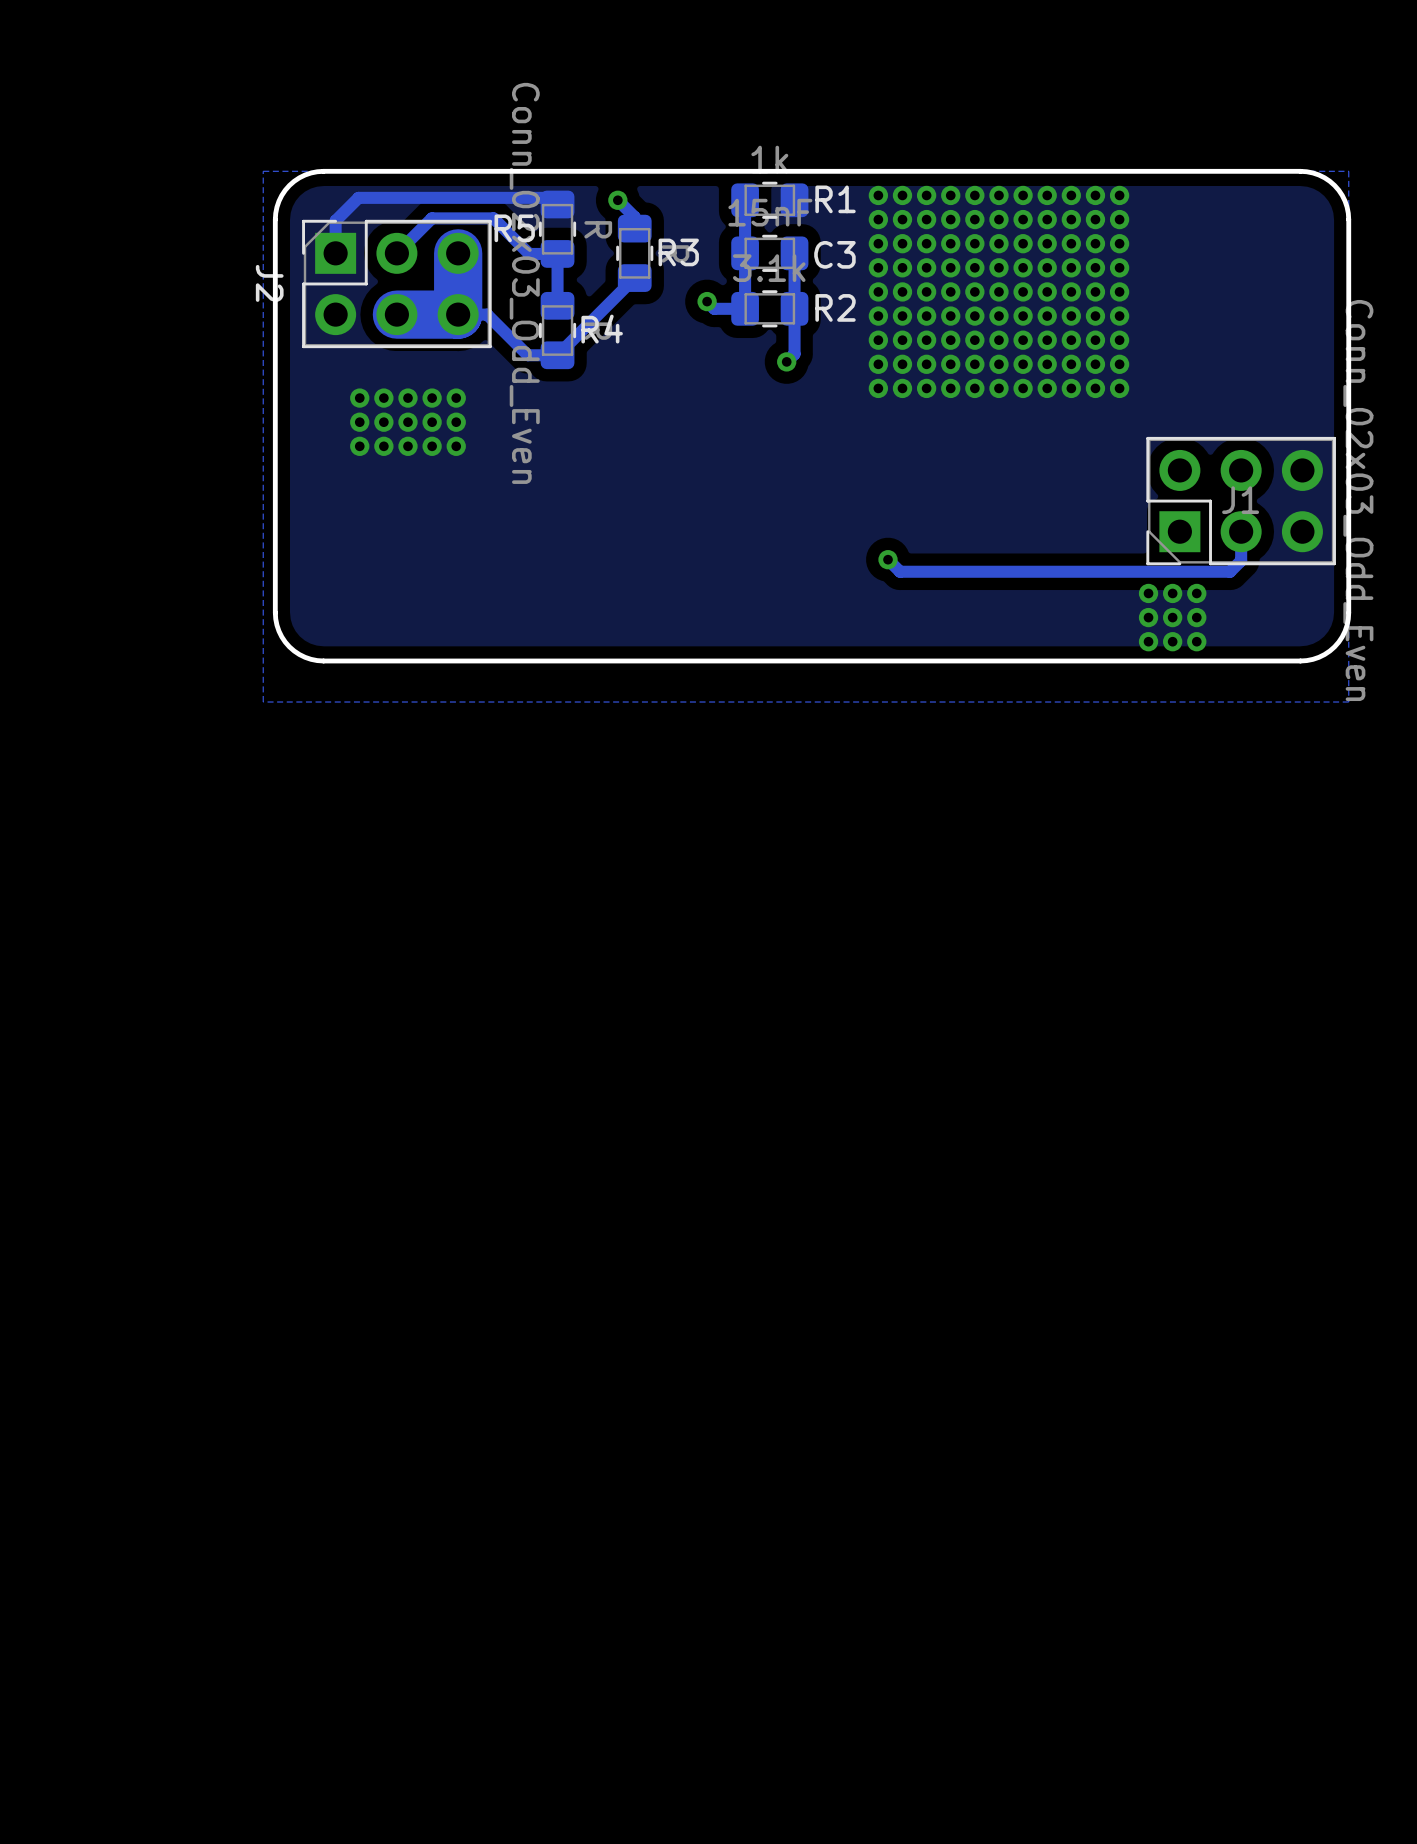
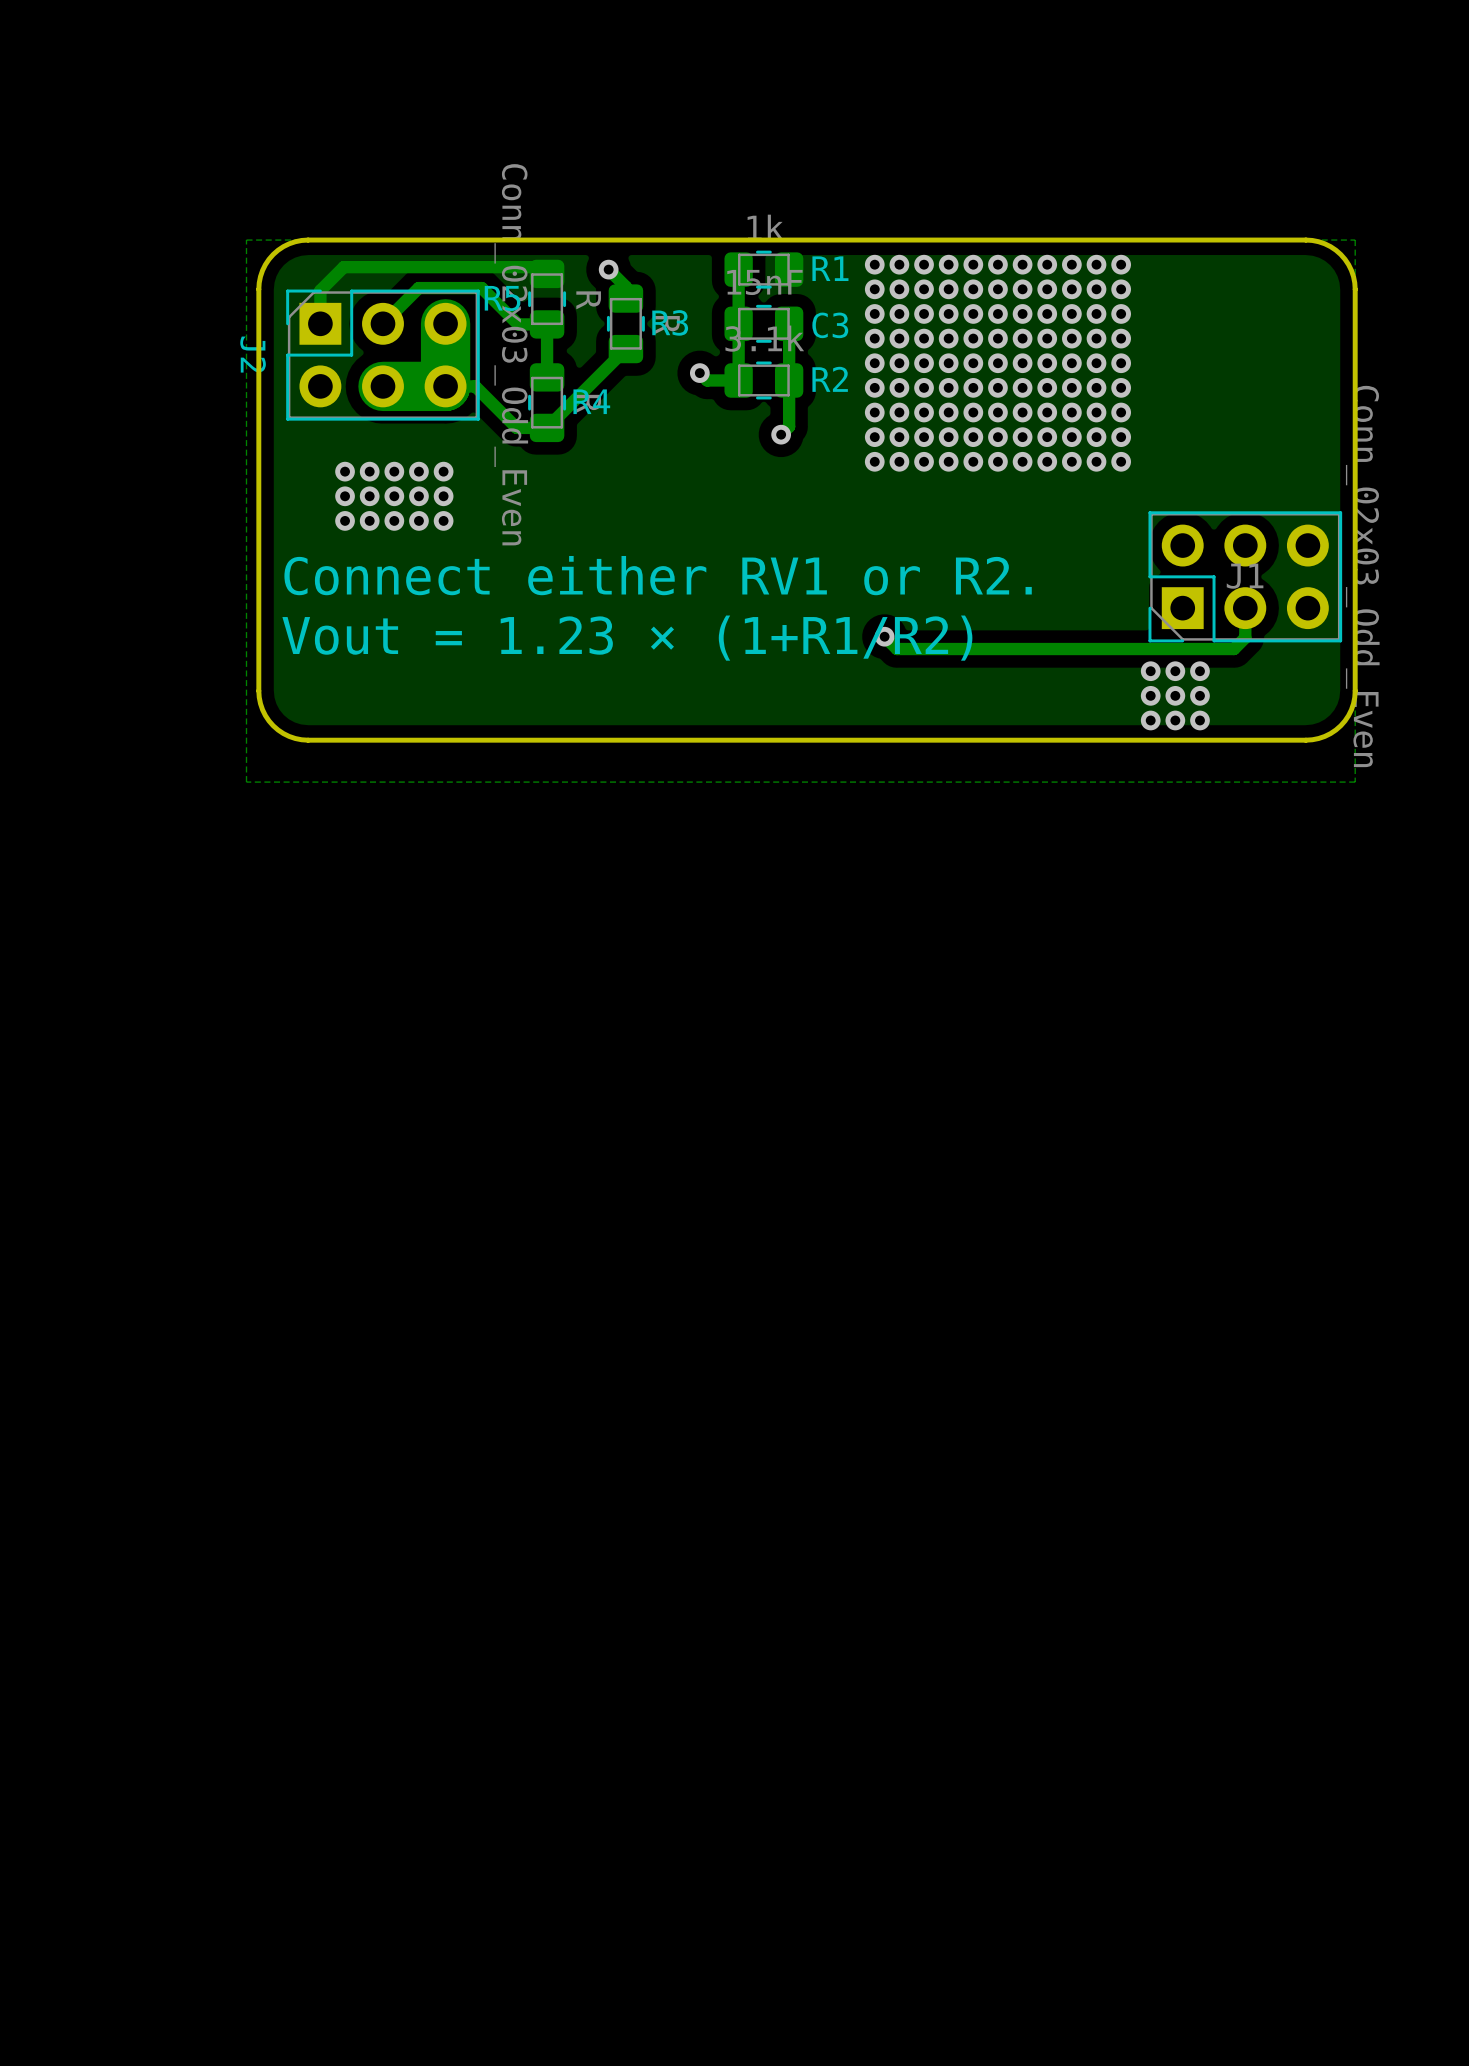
text: none -> Connect either RV1 or R2. (658, 575)
text: none -> Vout = 1.23 × (1+R1/R2) (627, 638)

